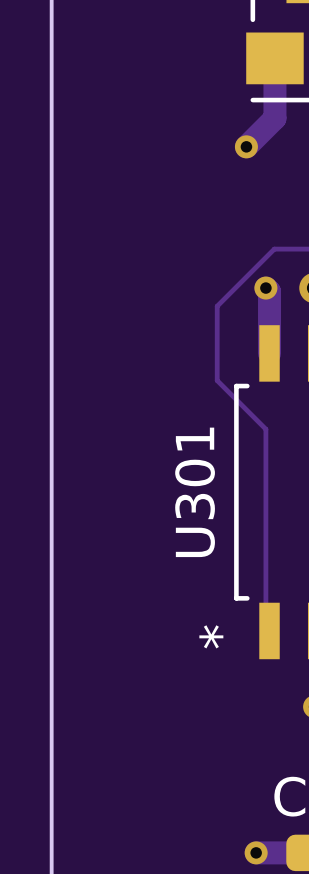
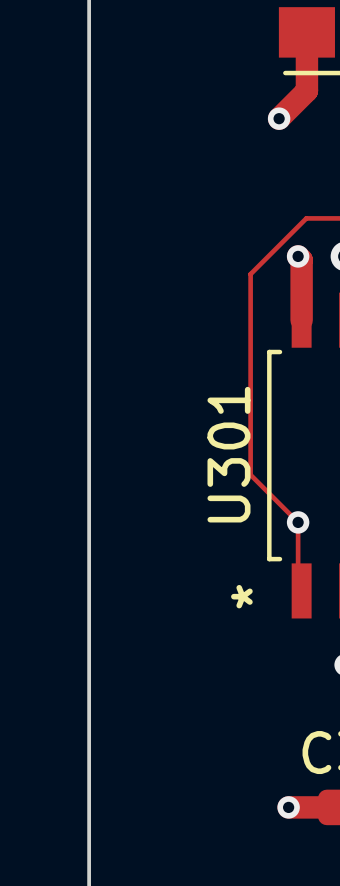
track: (217, 380) (265, 429) (265, 560) -> (250, 346) (250, 474) (298, 522)
via: none -> (298, 522)

